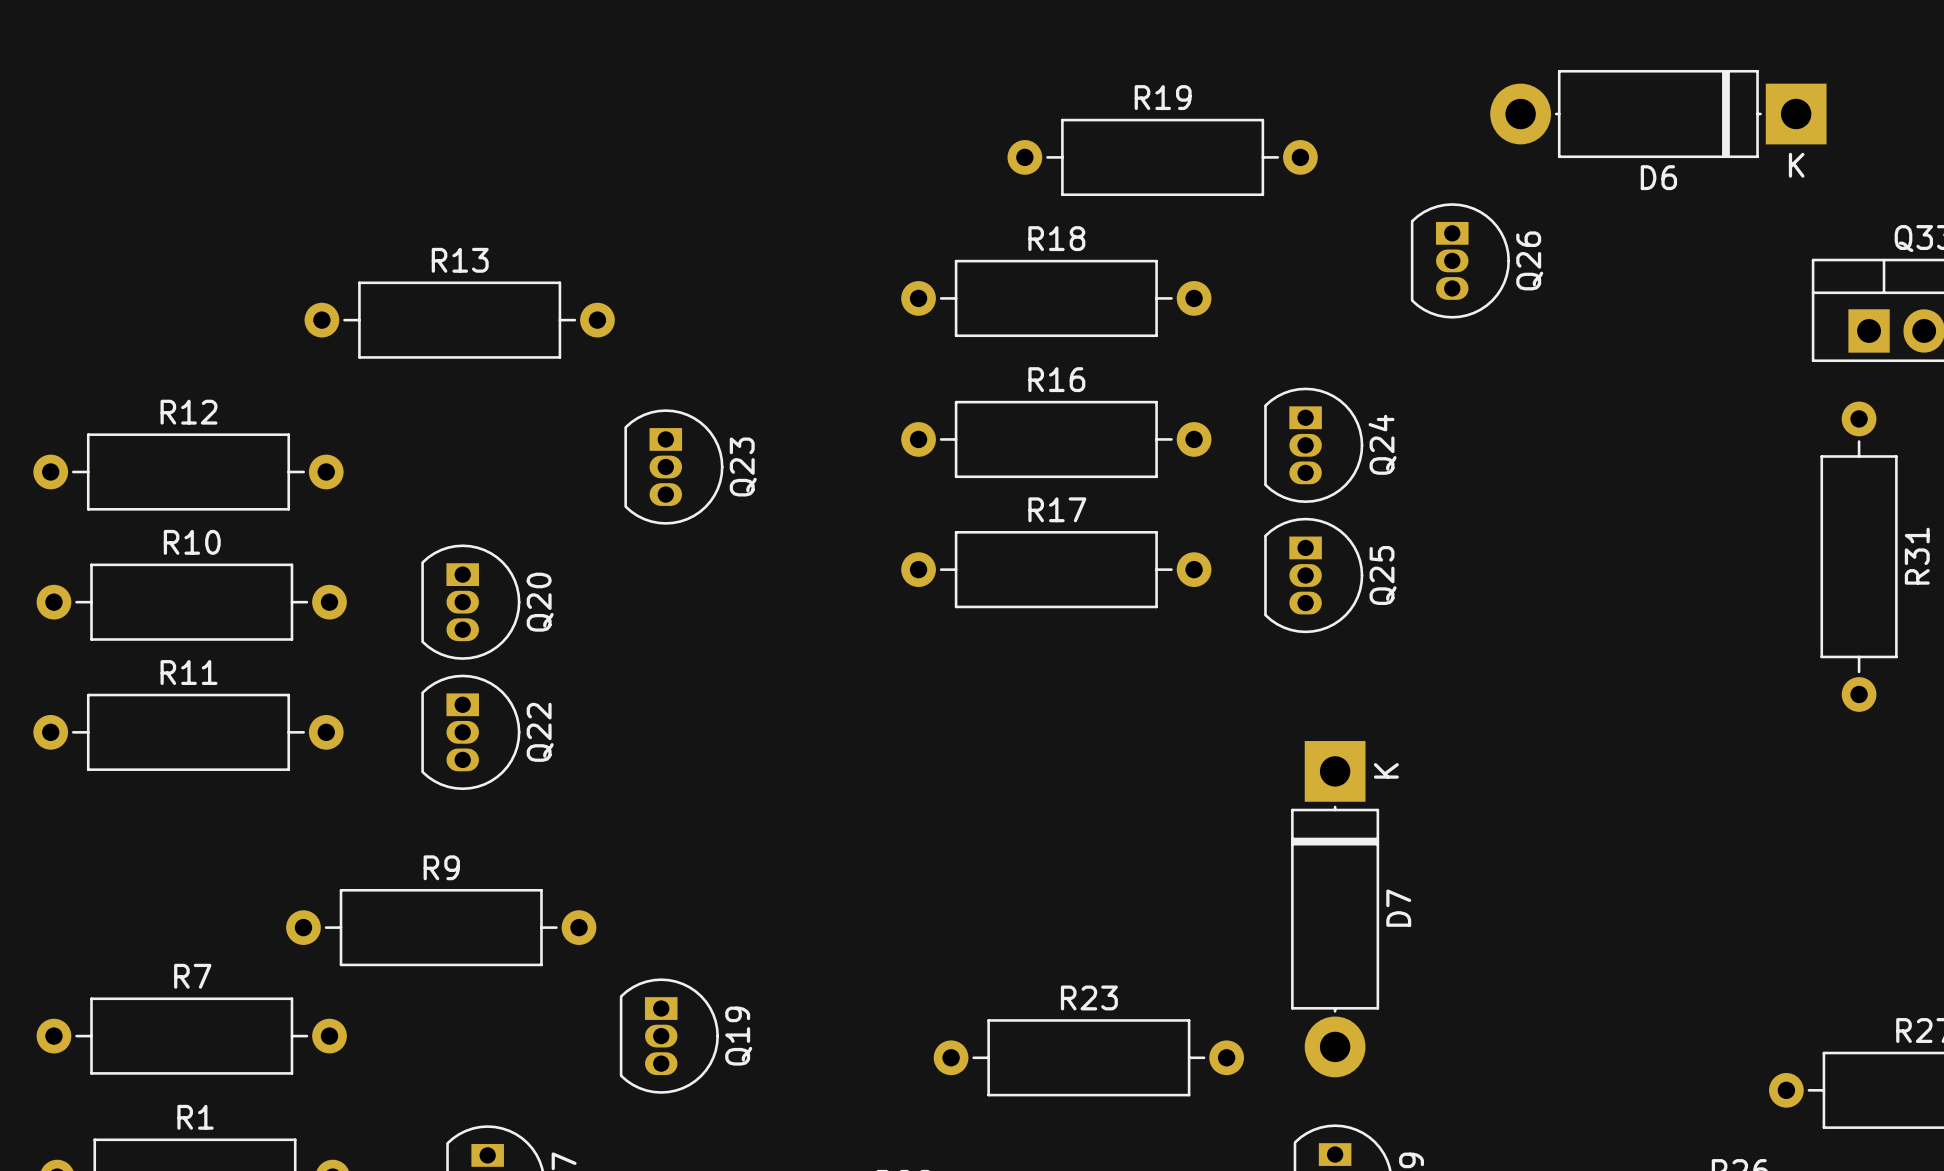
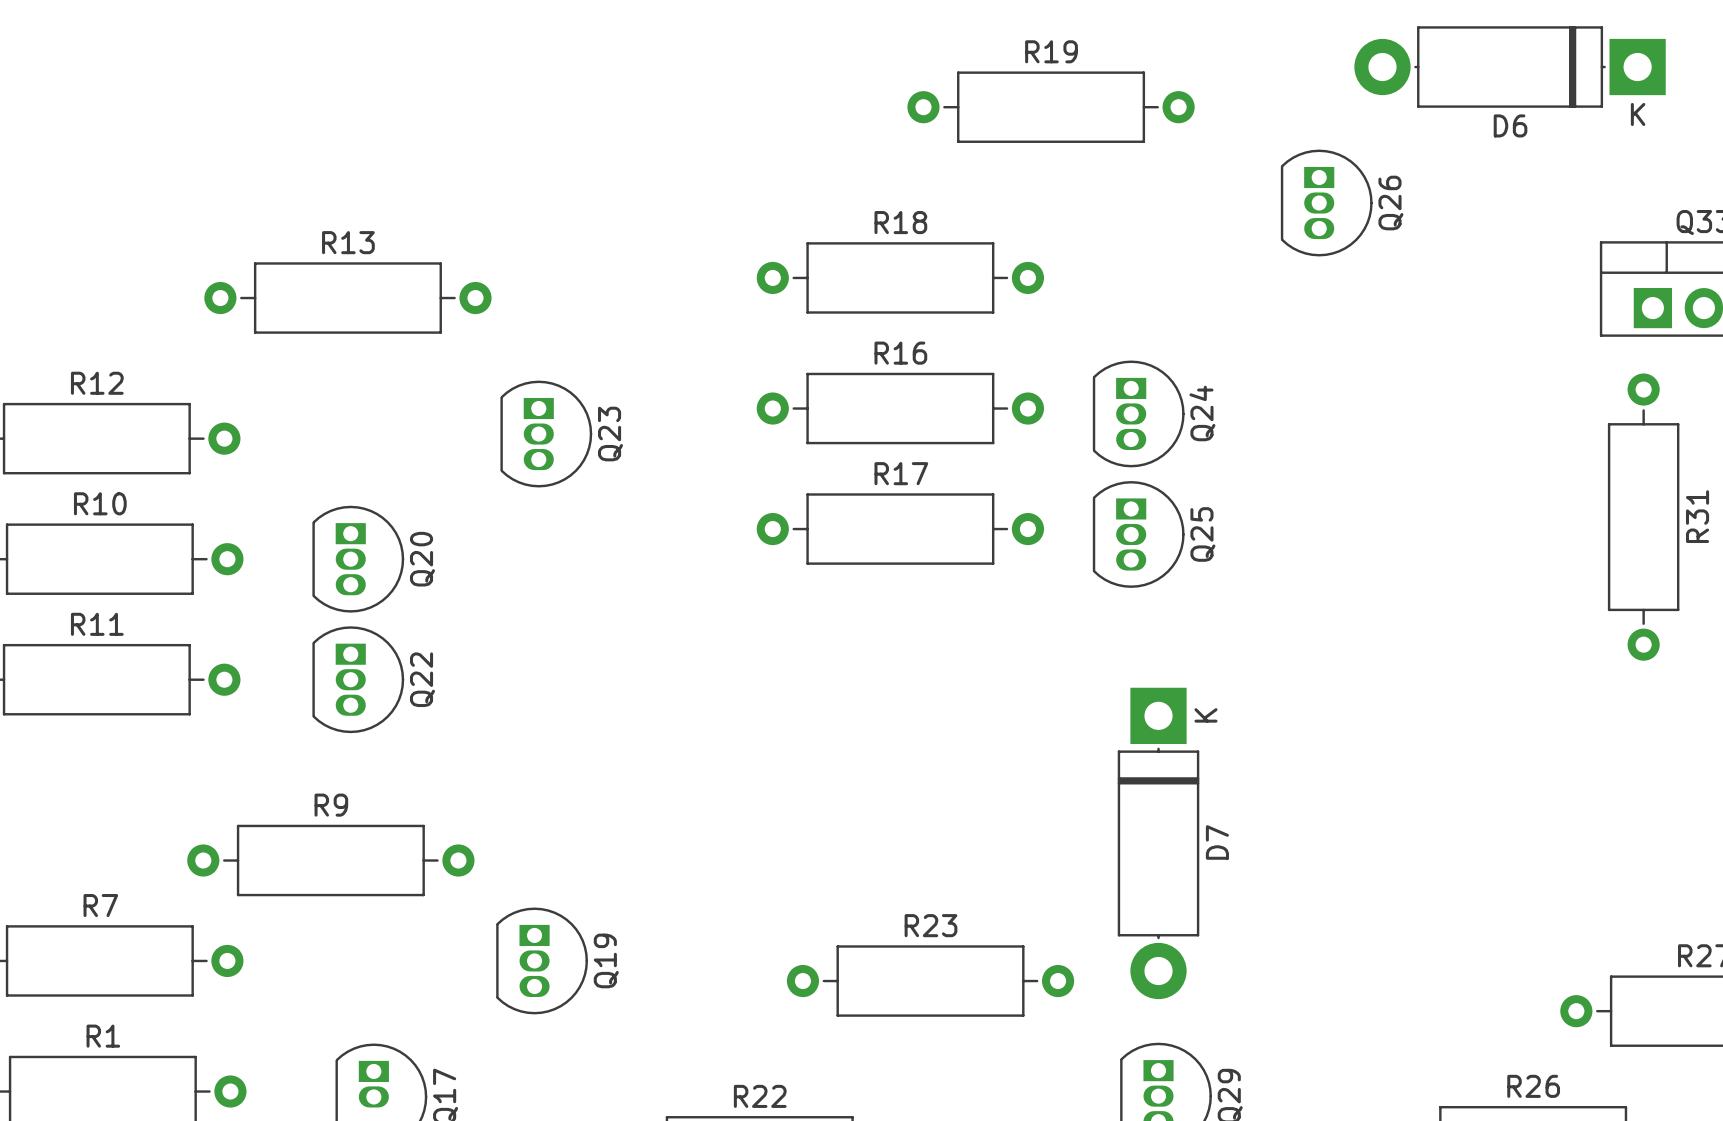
D6 position: (1658, 114) -> (1510, 67)
R19 position: (1162, 157) -> (1051, 107)
Q26 position: (1460, 260) -> (1326, 203)

